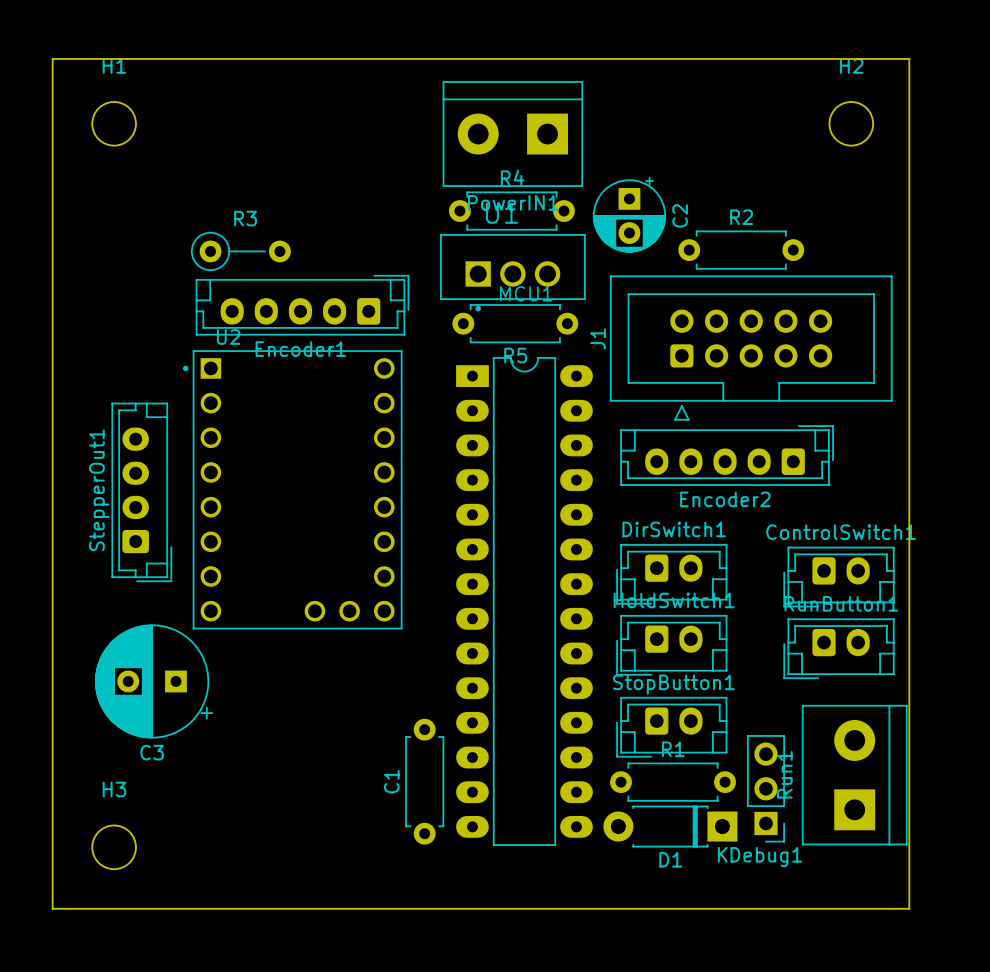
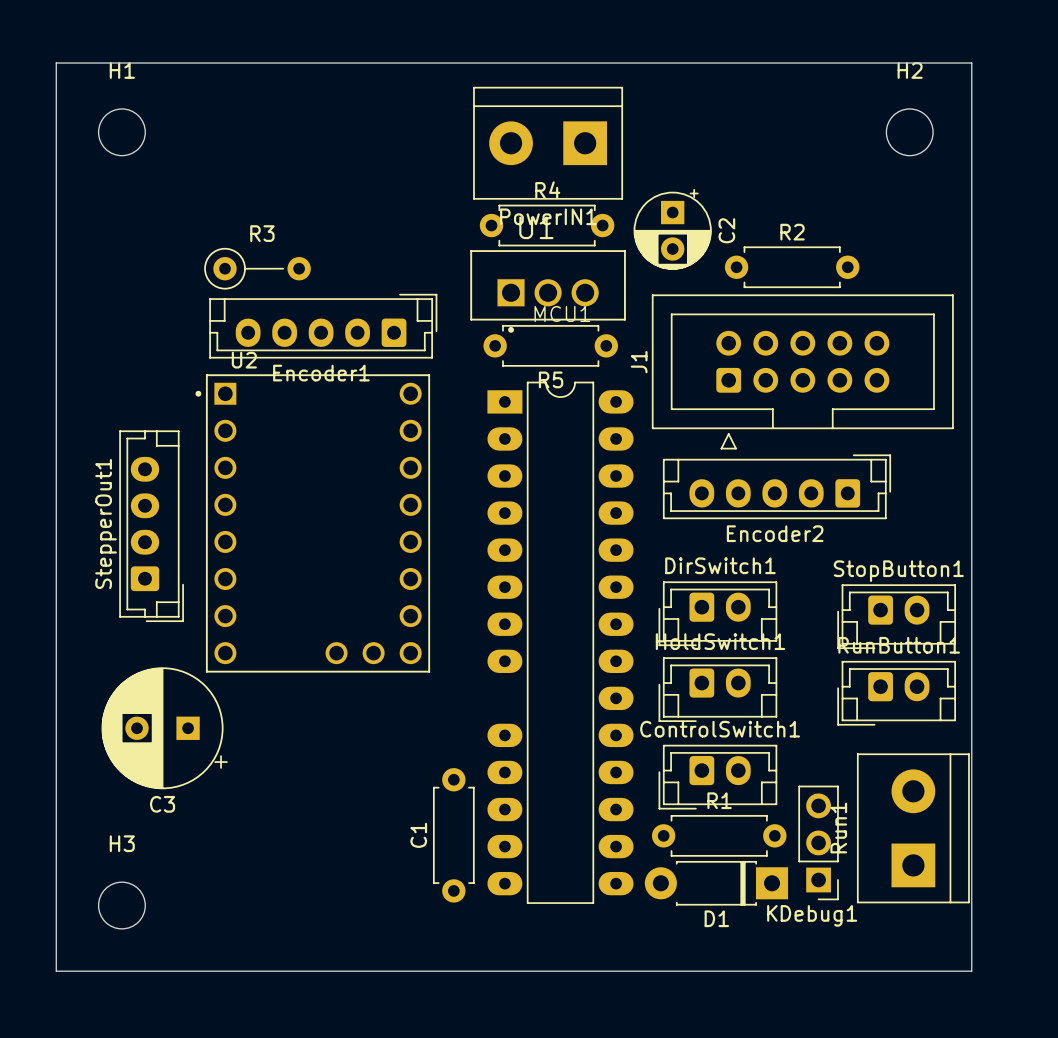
MCU1 footprint: [456, 357, 593, 846] -> [487, 381, 634, 904]
ControlSwitch1 name: ControlSwitch1 (841, 532) -> StopButton1 (898, 571)
StopButton1 name: StopButton1 (673, 684) -> ControlSwitch1 (720, 729)

